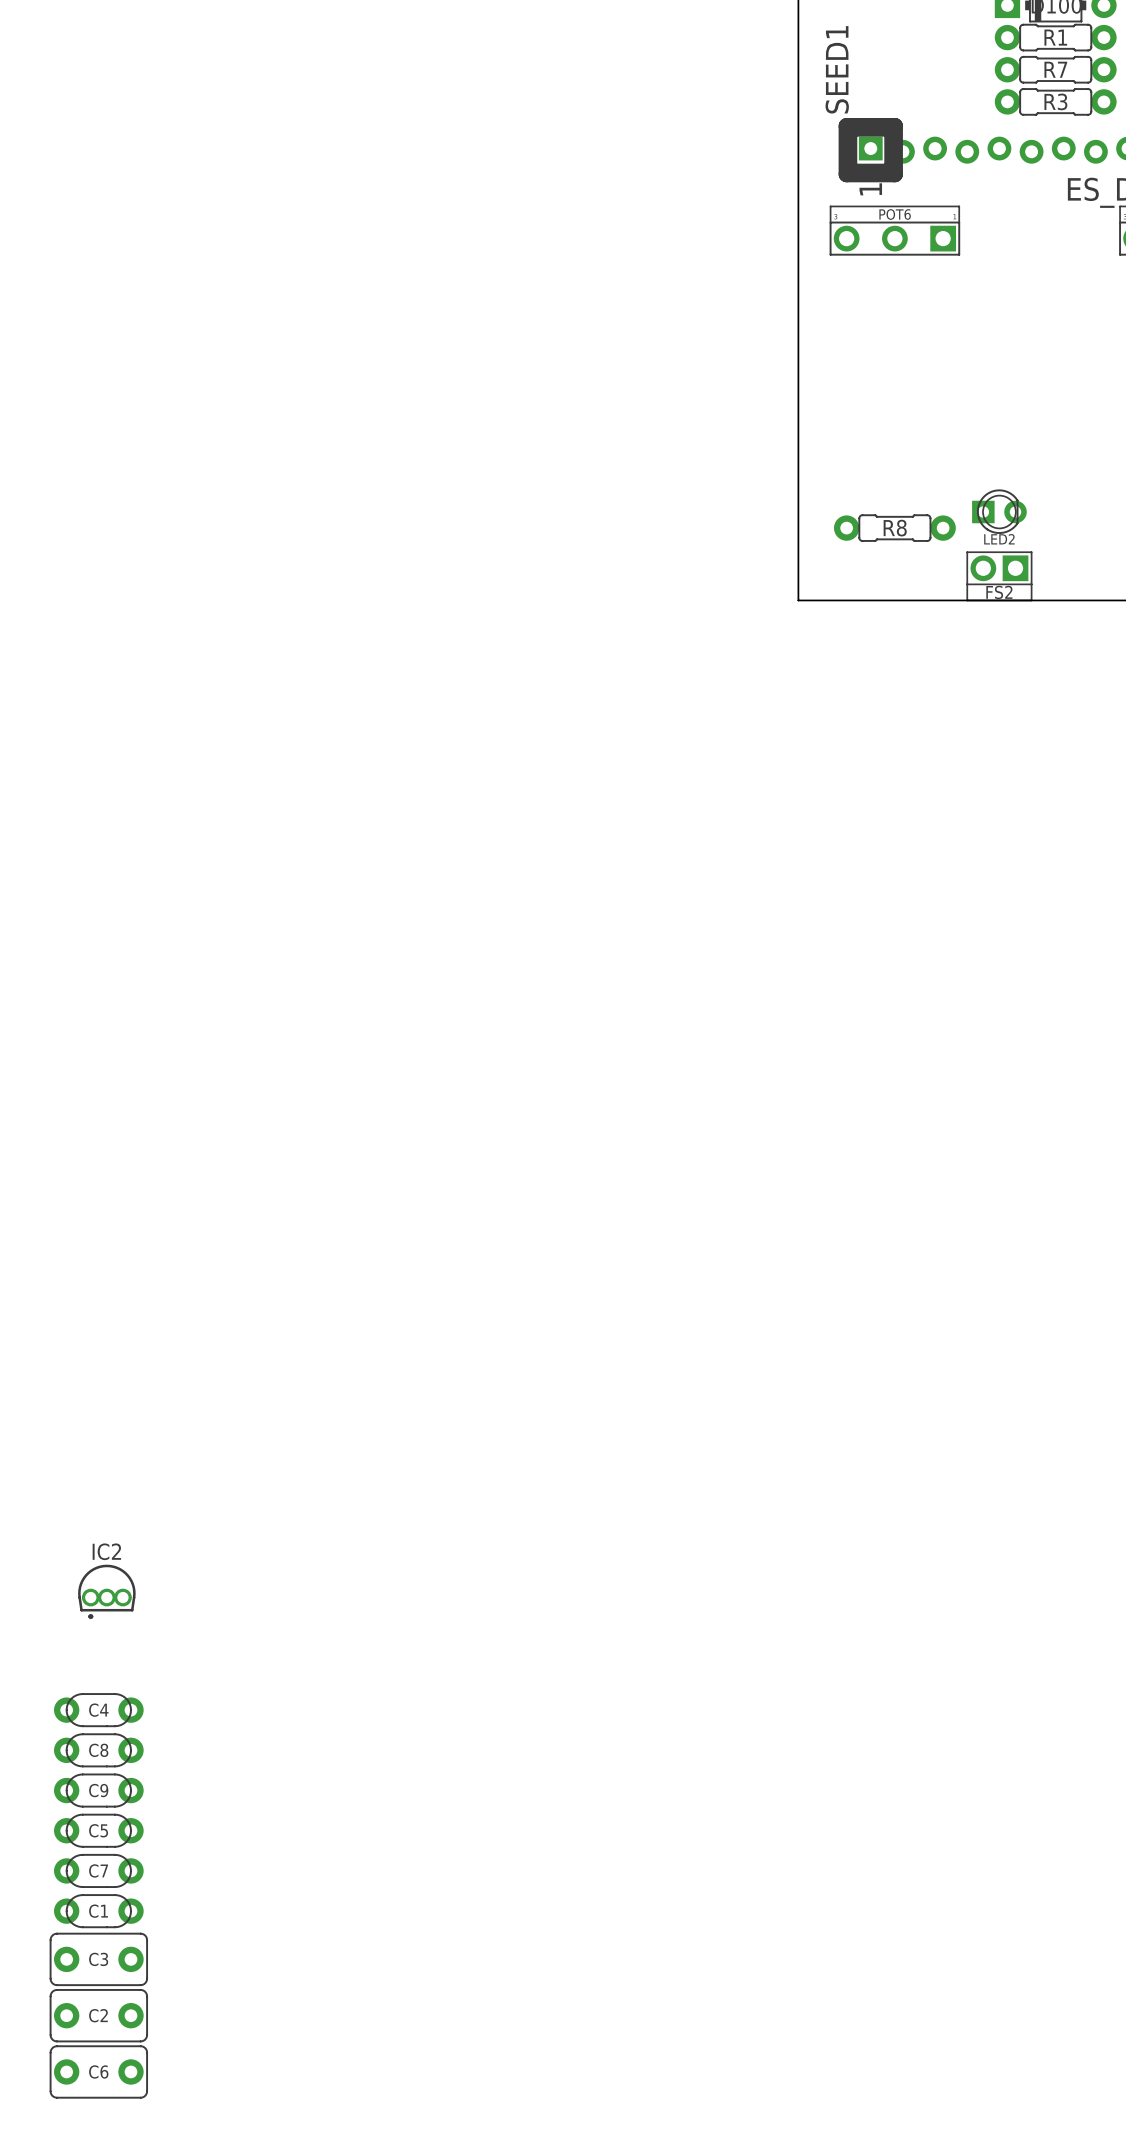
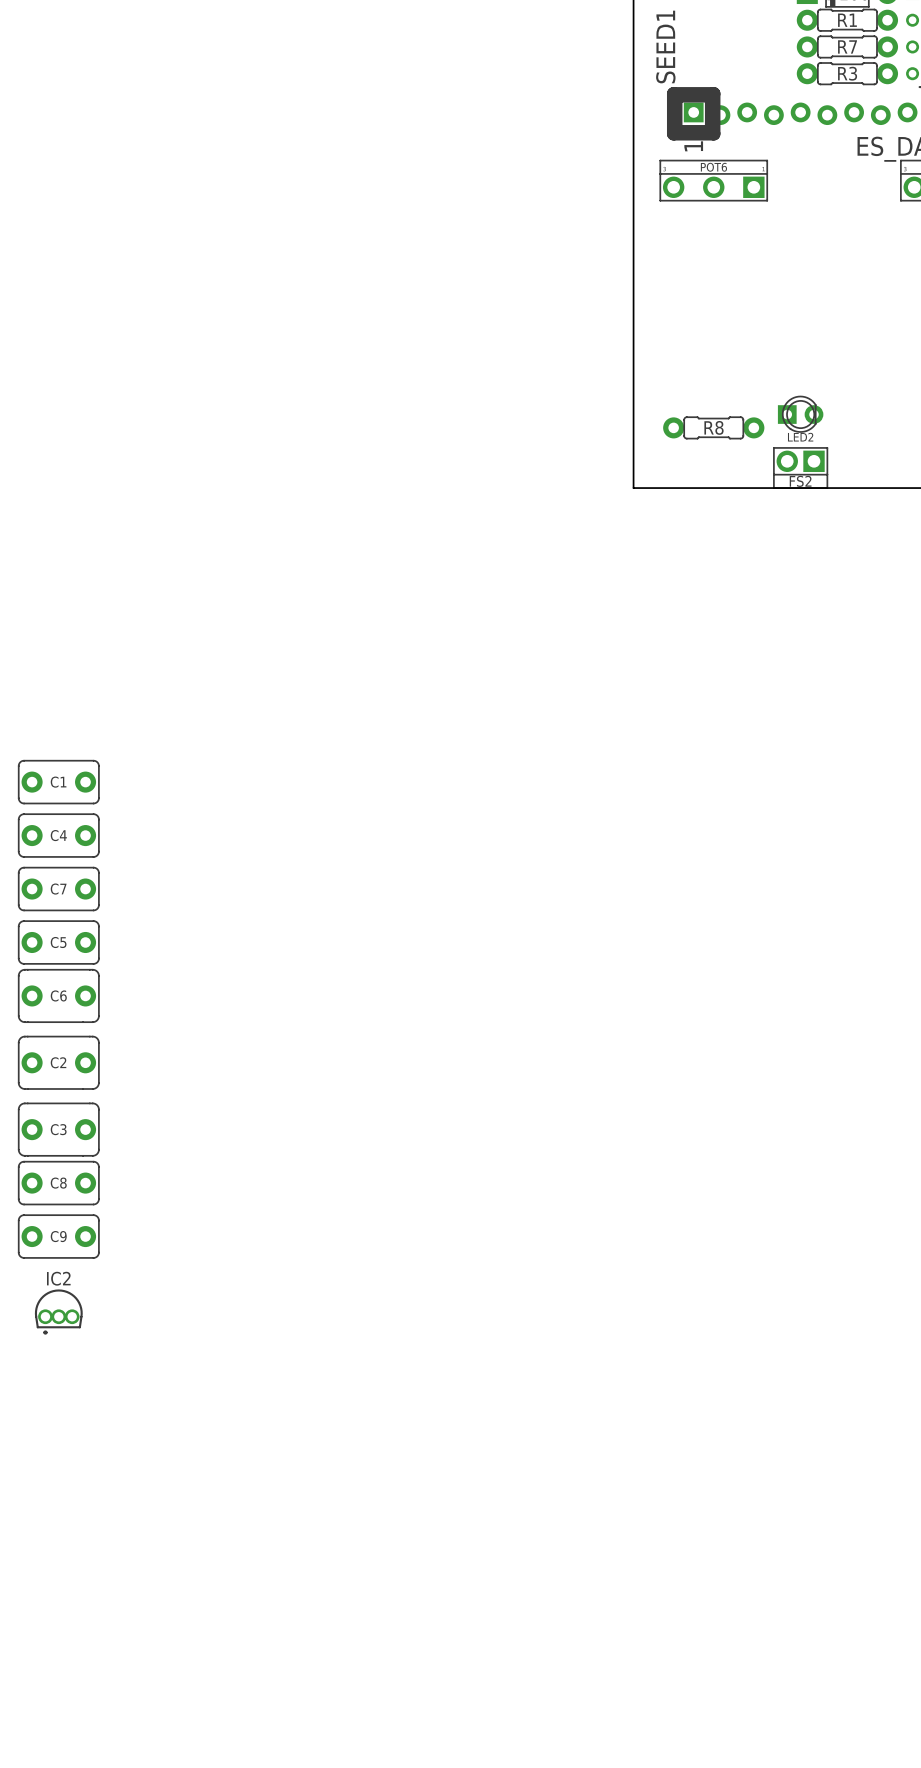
C4 footprint: [54, 1693, 144, 1728] -> [17, 813, 100, 858]
C8 footprint: [54, 1733, 144, 1768] -> [17, 1160, 100, 1206]
C9 footprint: [54, 1773, 144, 1808] -> [17, 1214, 100, 1259]
C5 footprint: [54, 1813, 144, 1848] -> [17, 920, 100, 965]
C7 footprint: [54, 1853, 144, 1888] -> [17, 866, 100, 912]
C1 footprint: [54, 1894, 144, 1929] -> [17, 759, 100, 805]
C3 footprint: [49, 1932, 149, 1987] -> [17, 1102, 100, 1157]
C2 footprint: [49, 1988, 149, 2043] -> [17, 1035, 100, 1090]
C6 footprint: [49, 2045, 149, 2099] -> [17, 968, 100, 1023]

